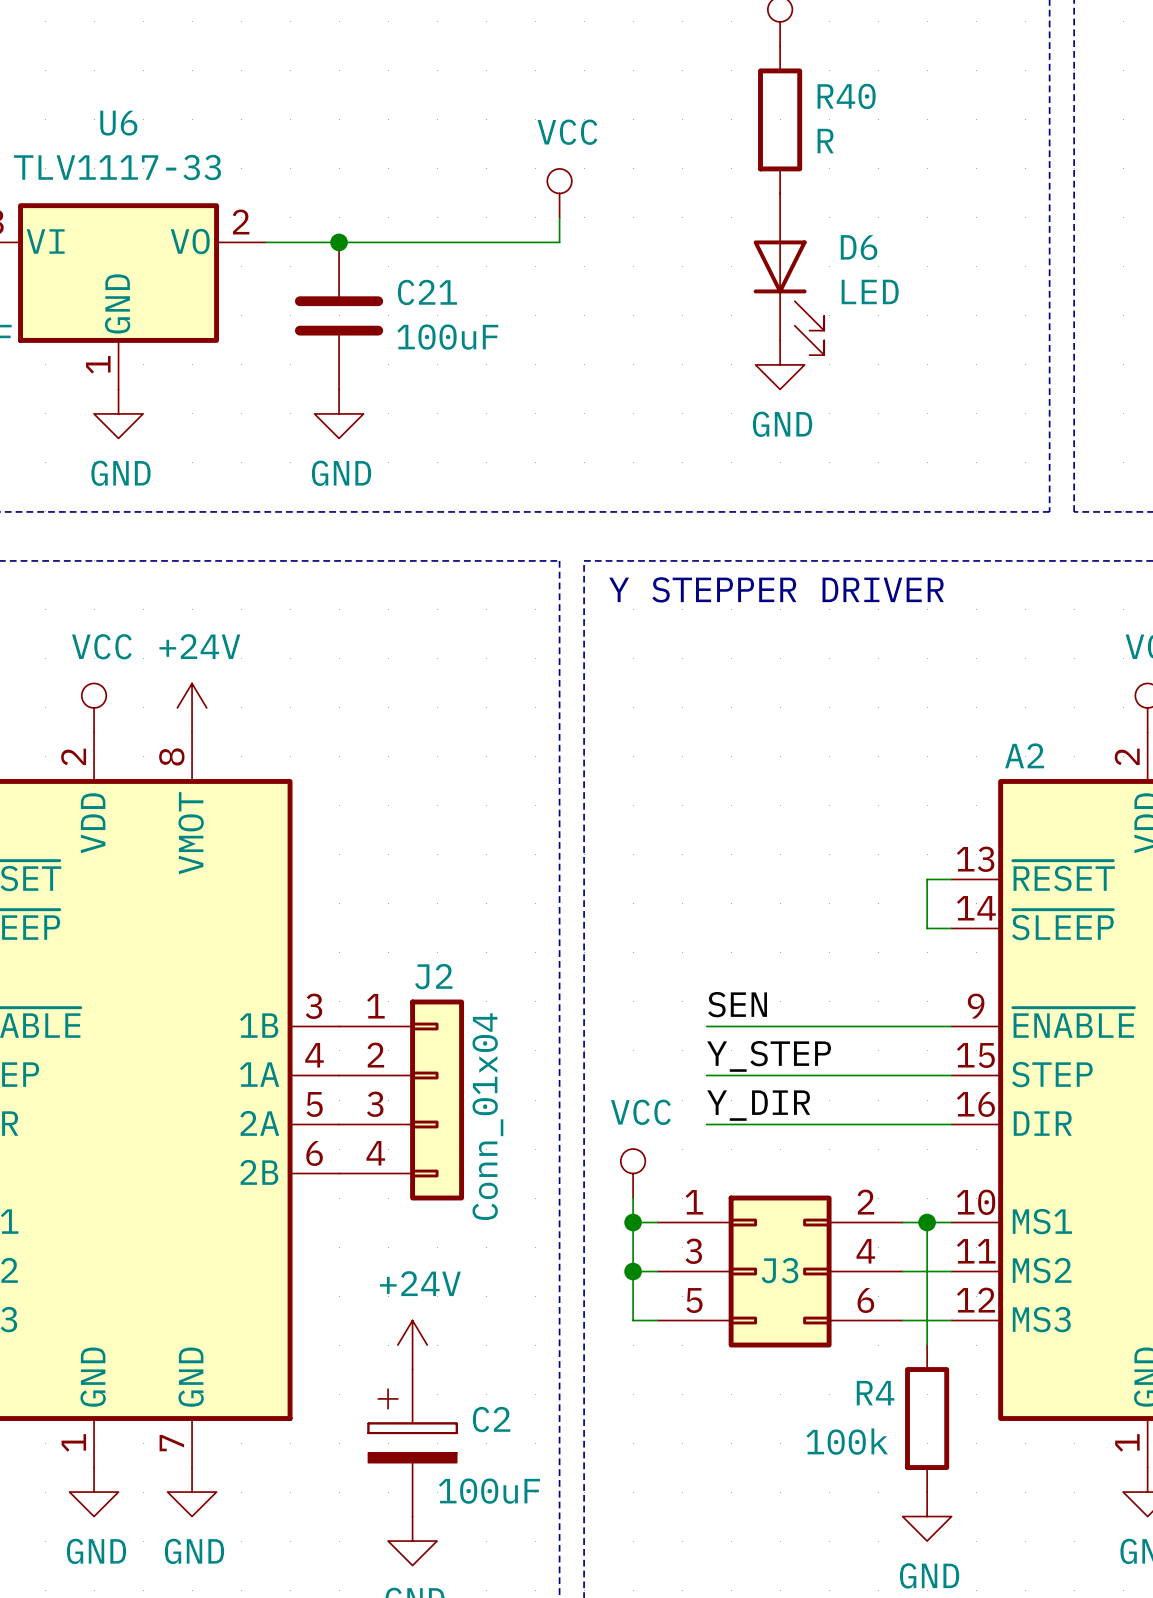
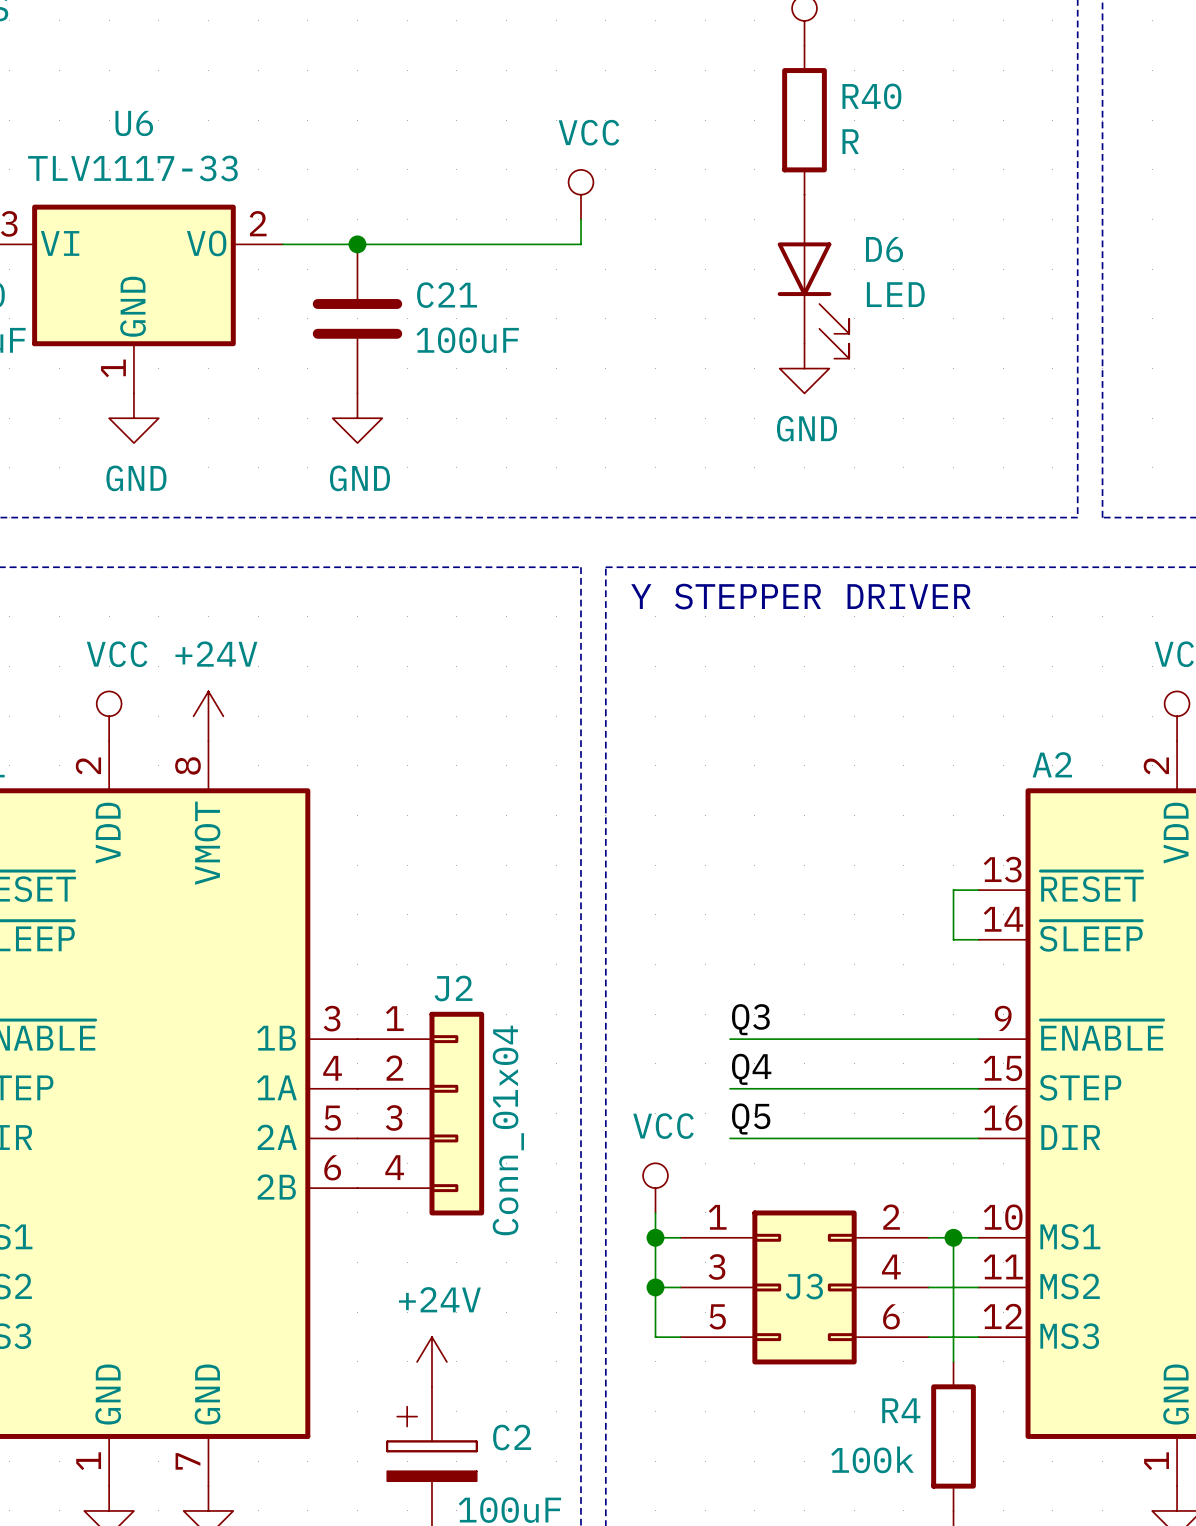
label: SEN (737, 1004) -> Q3 (750, 1019)
label: Y_STEP (769, 1056) -> Q4 (751, 1069)
label: Y_DIR (758, 1105) -> Q5 (751, 1118)

